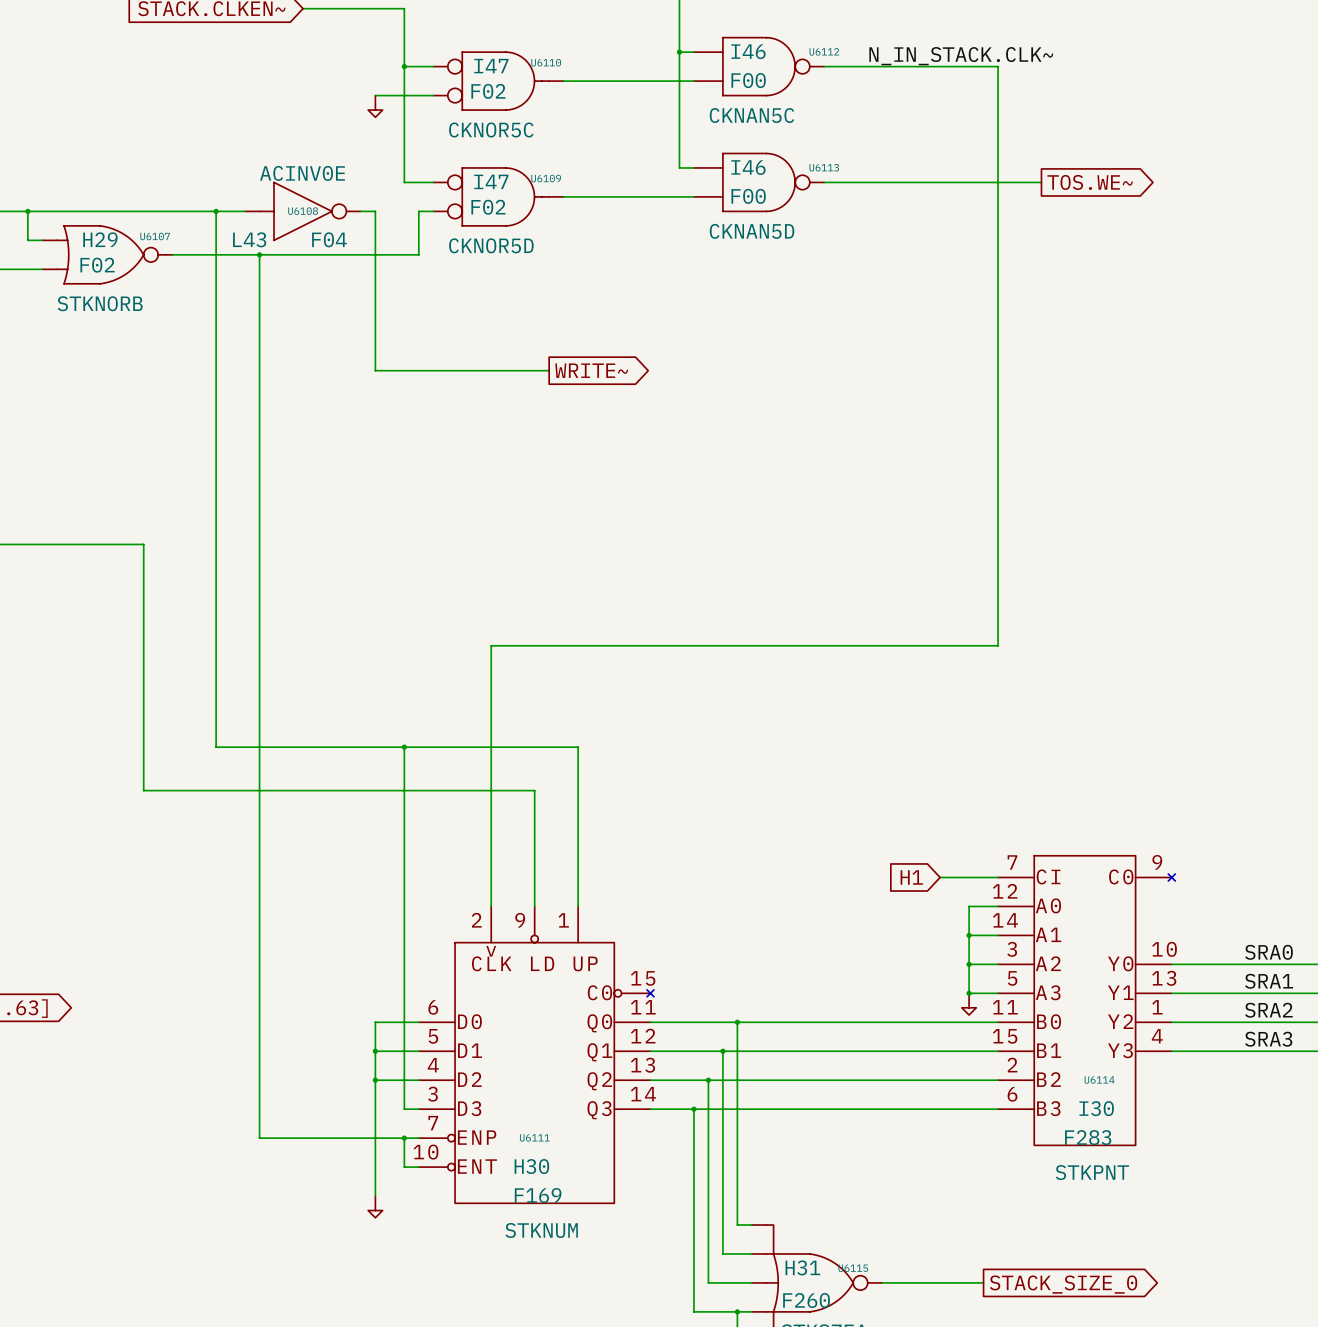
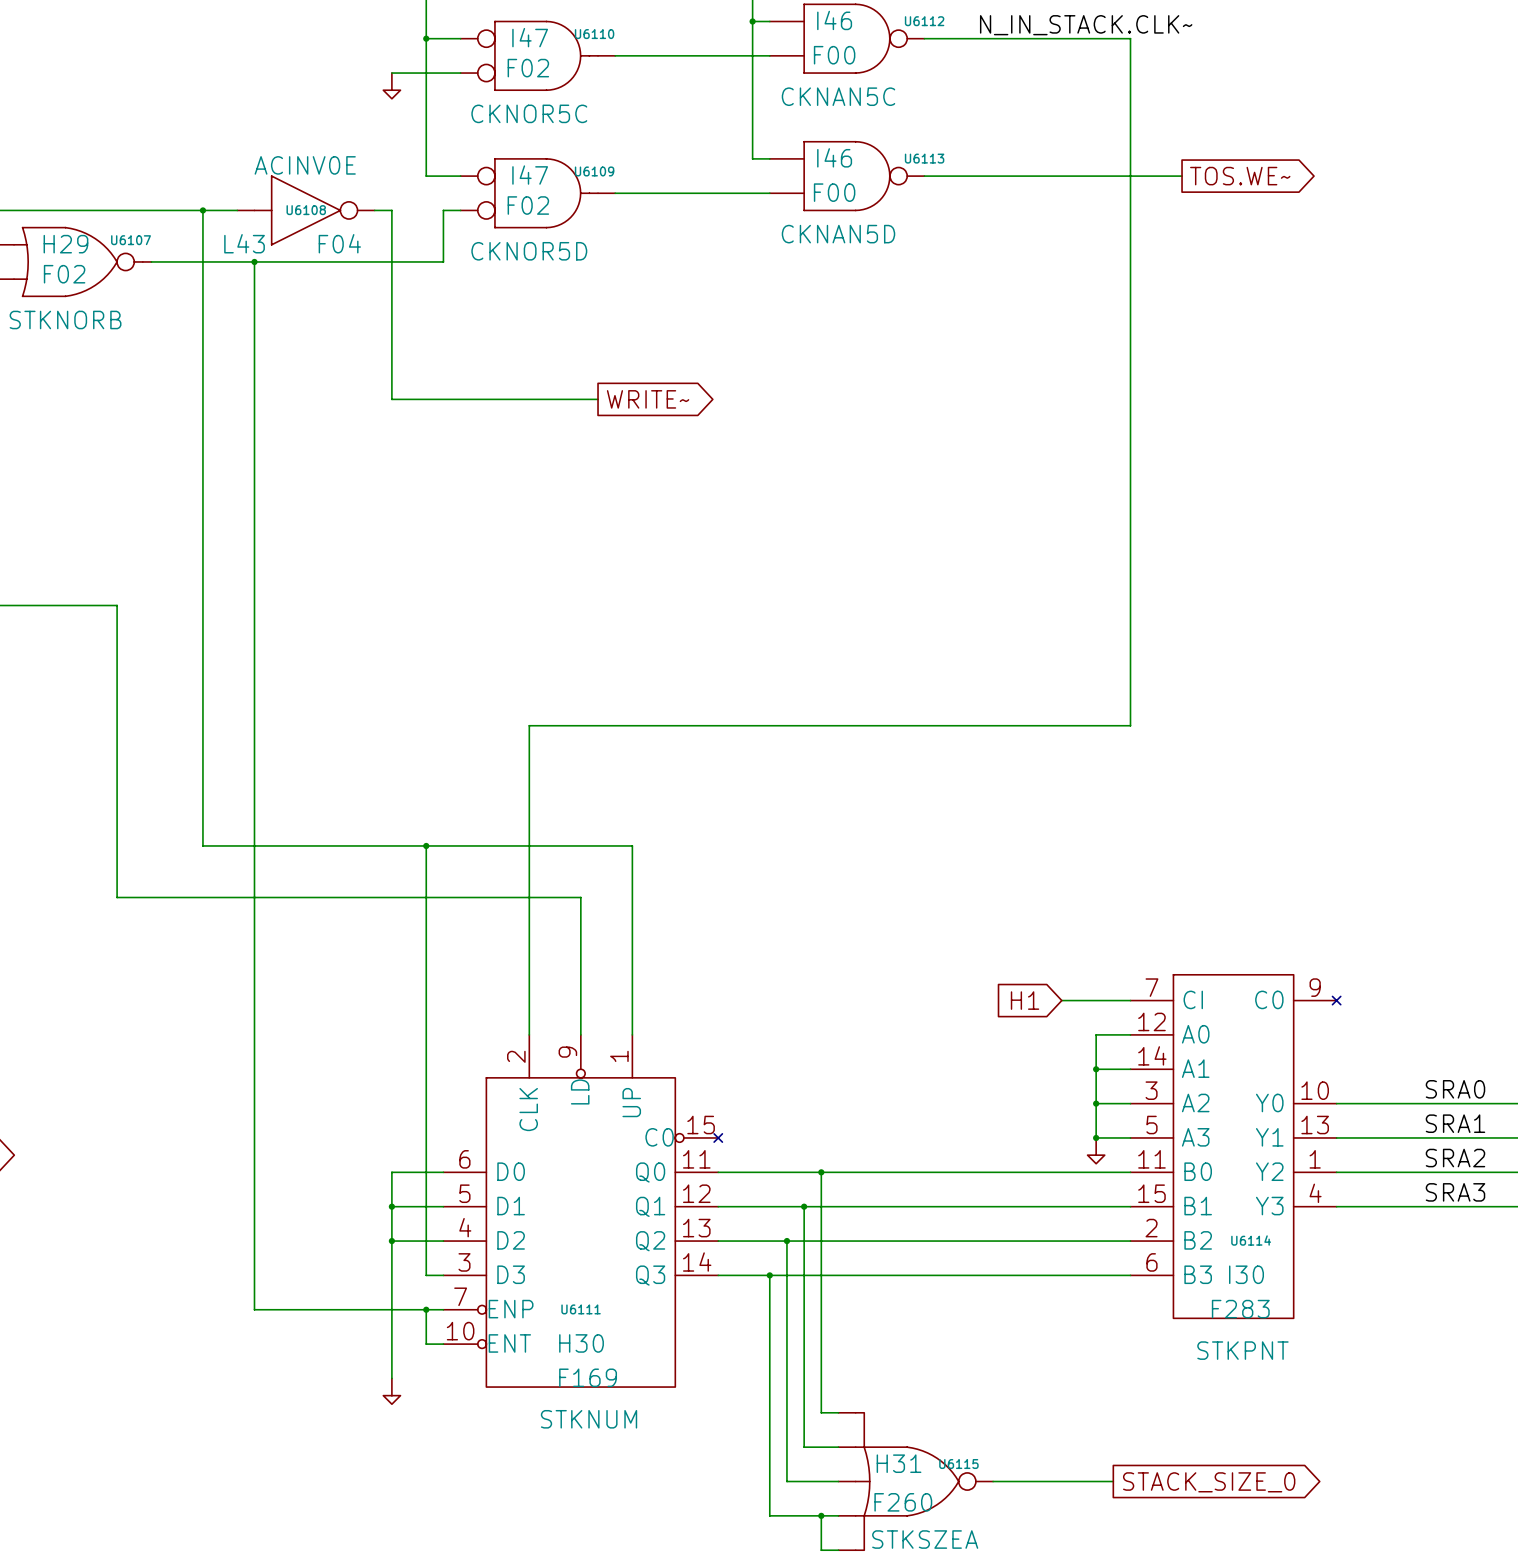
U6114 symbol: [998, 855, 1172, 1146] -> [1130, 974, 1337, 1319]
U6111 symbol: [418, 906, 651, 1204] -> [443, 1034, 719, 1388]

